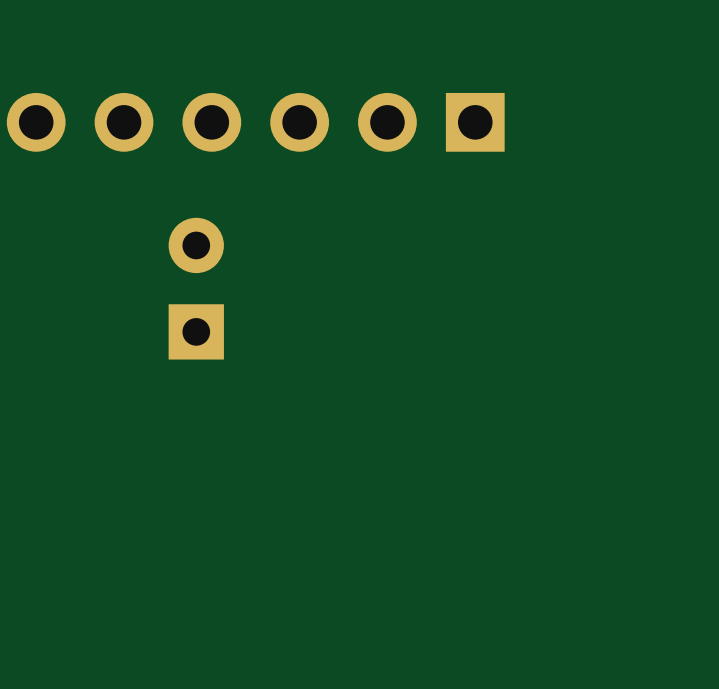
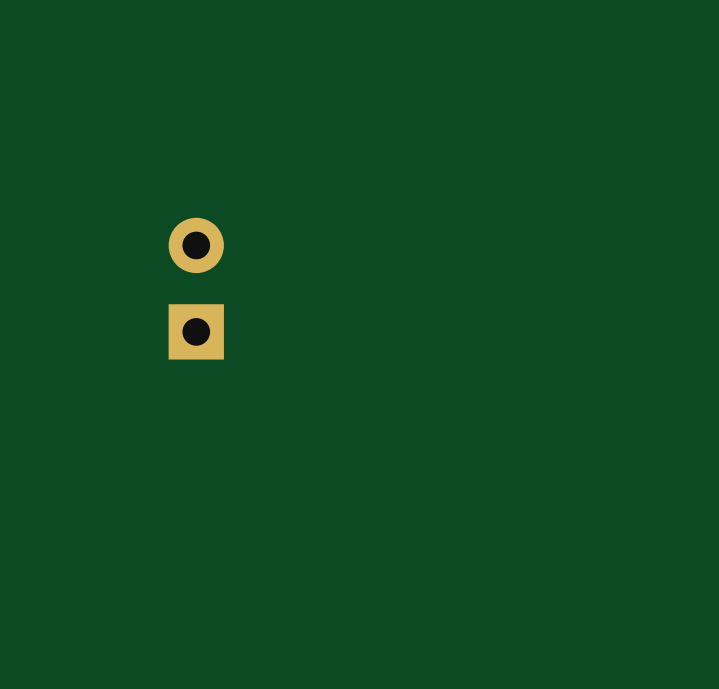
part: (255, 122) -> none

